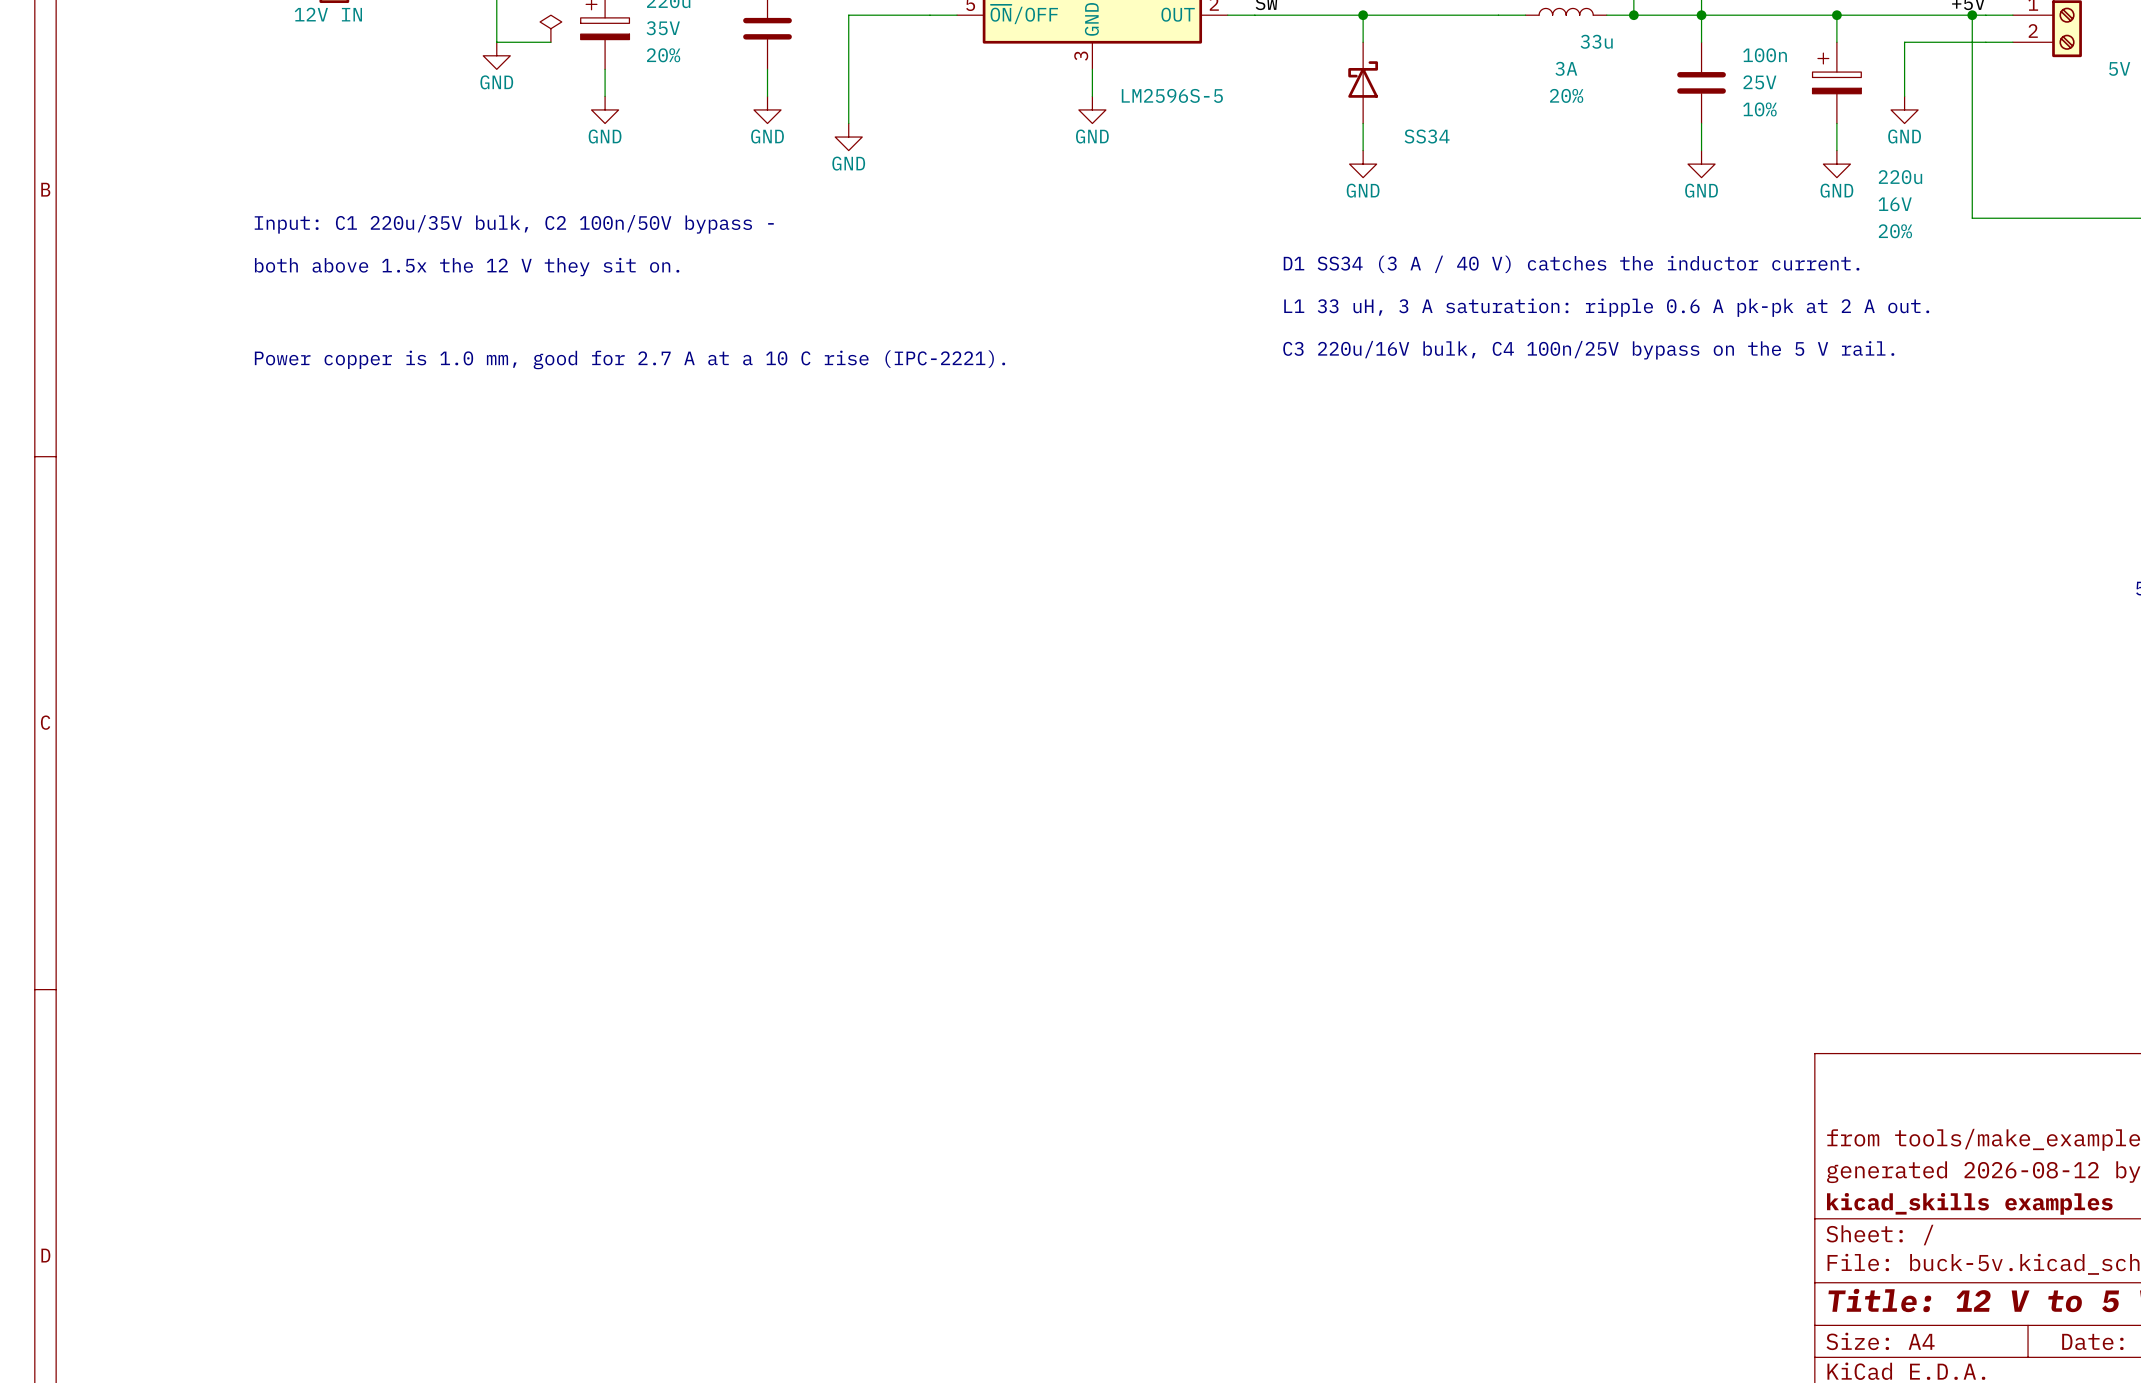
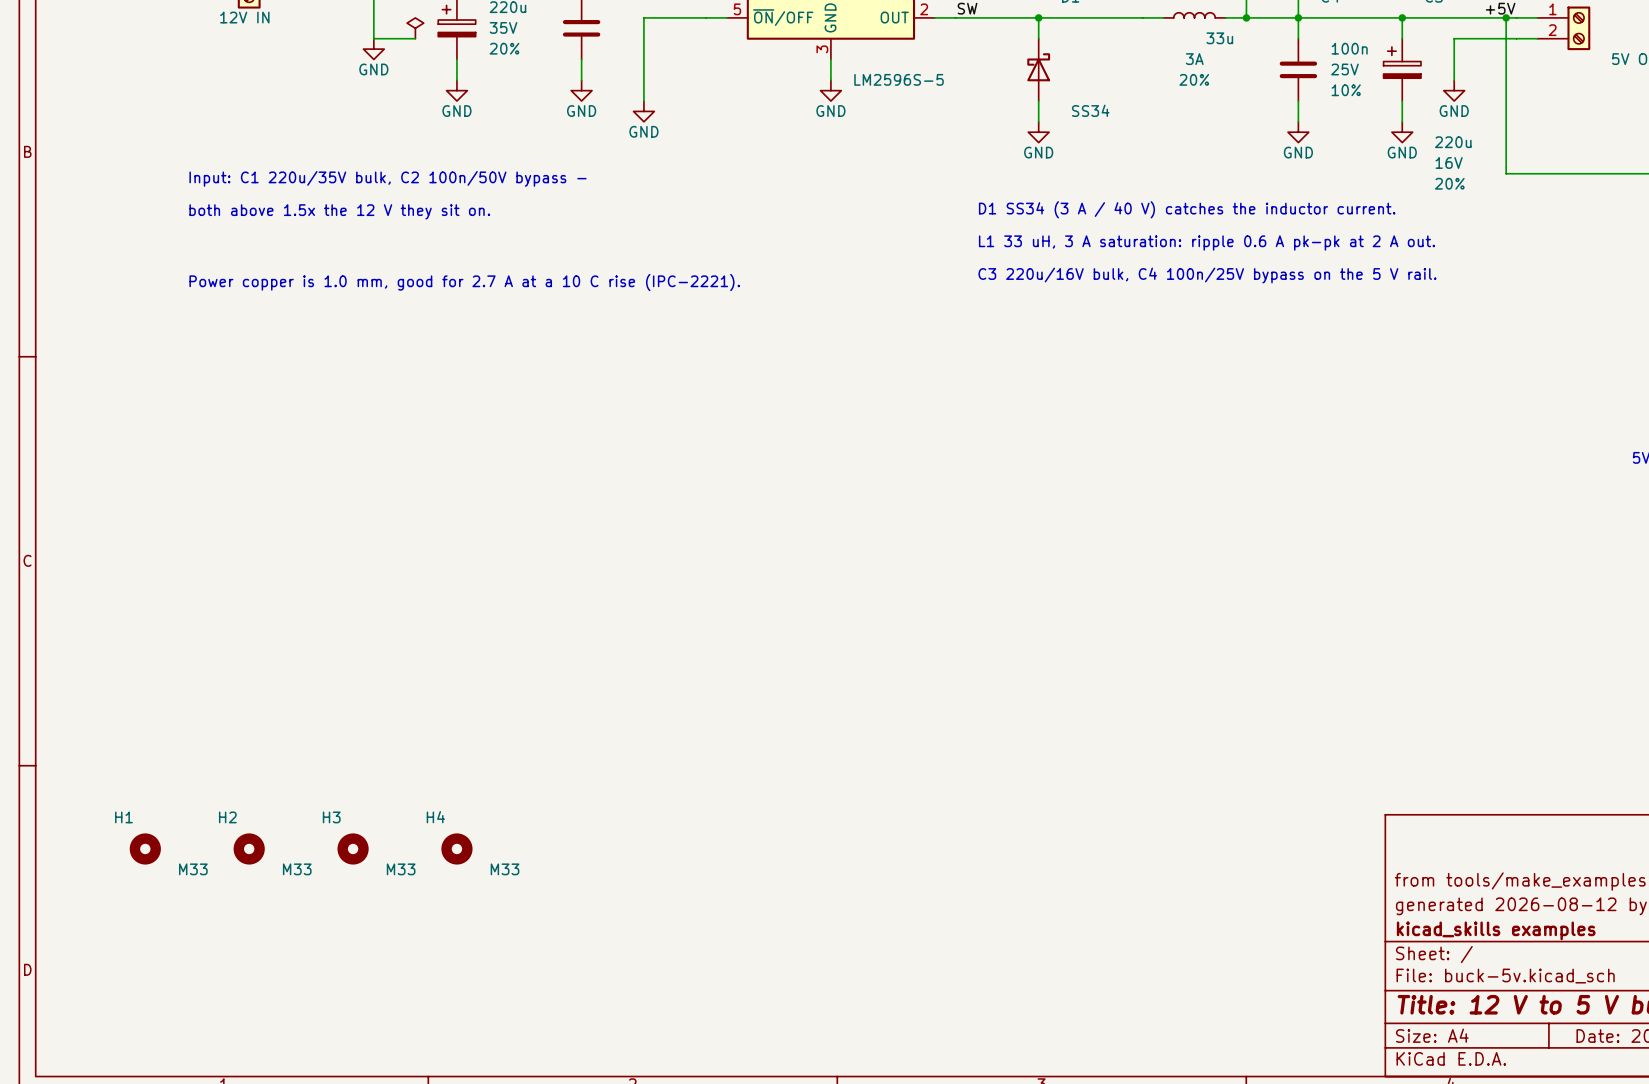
H1: none -> M33 (145, 848)
H2: none -> M33 (249, 848)
H3: none -> M33 (353, 848)
H4: none -> M33 (456, 848)

